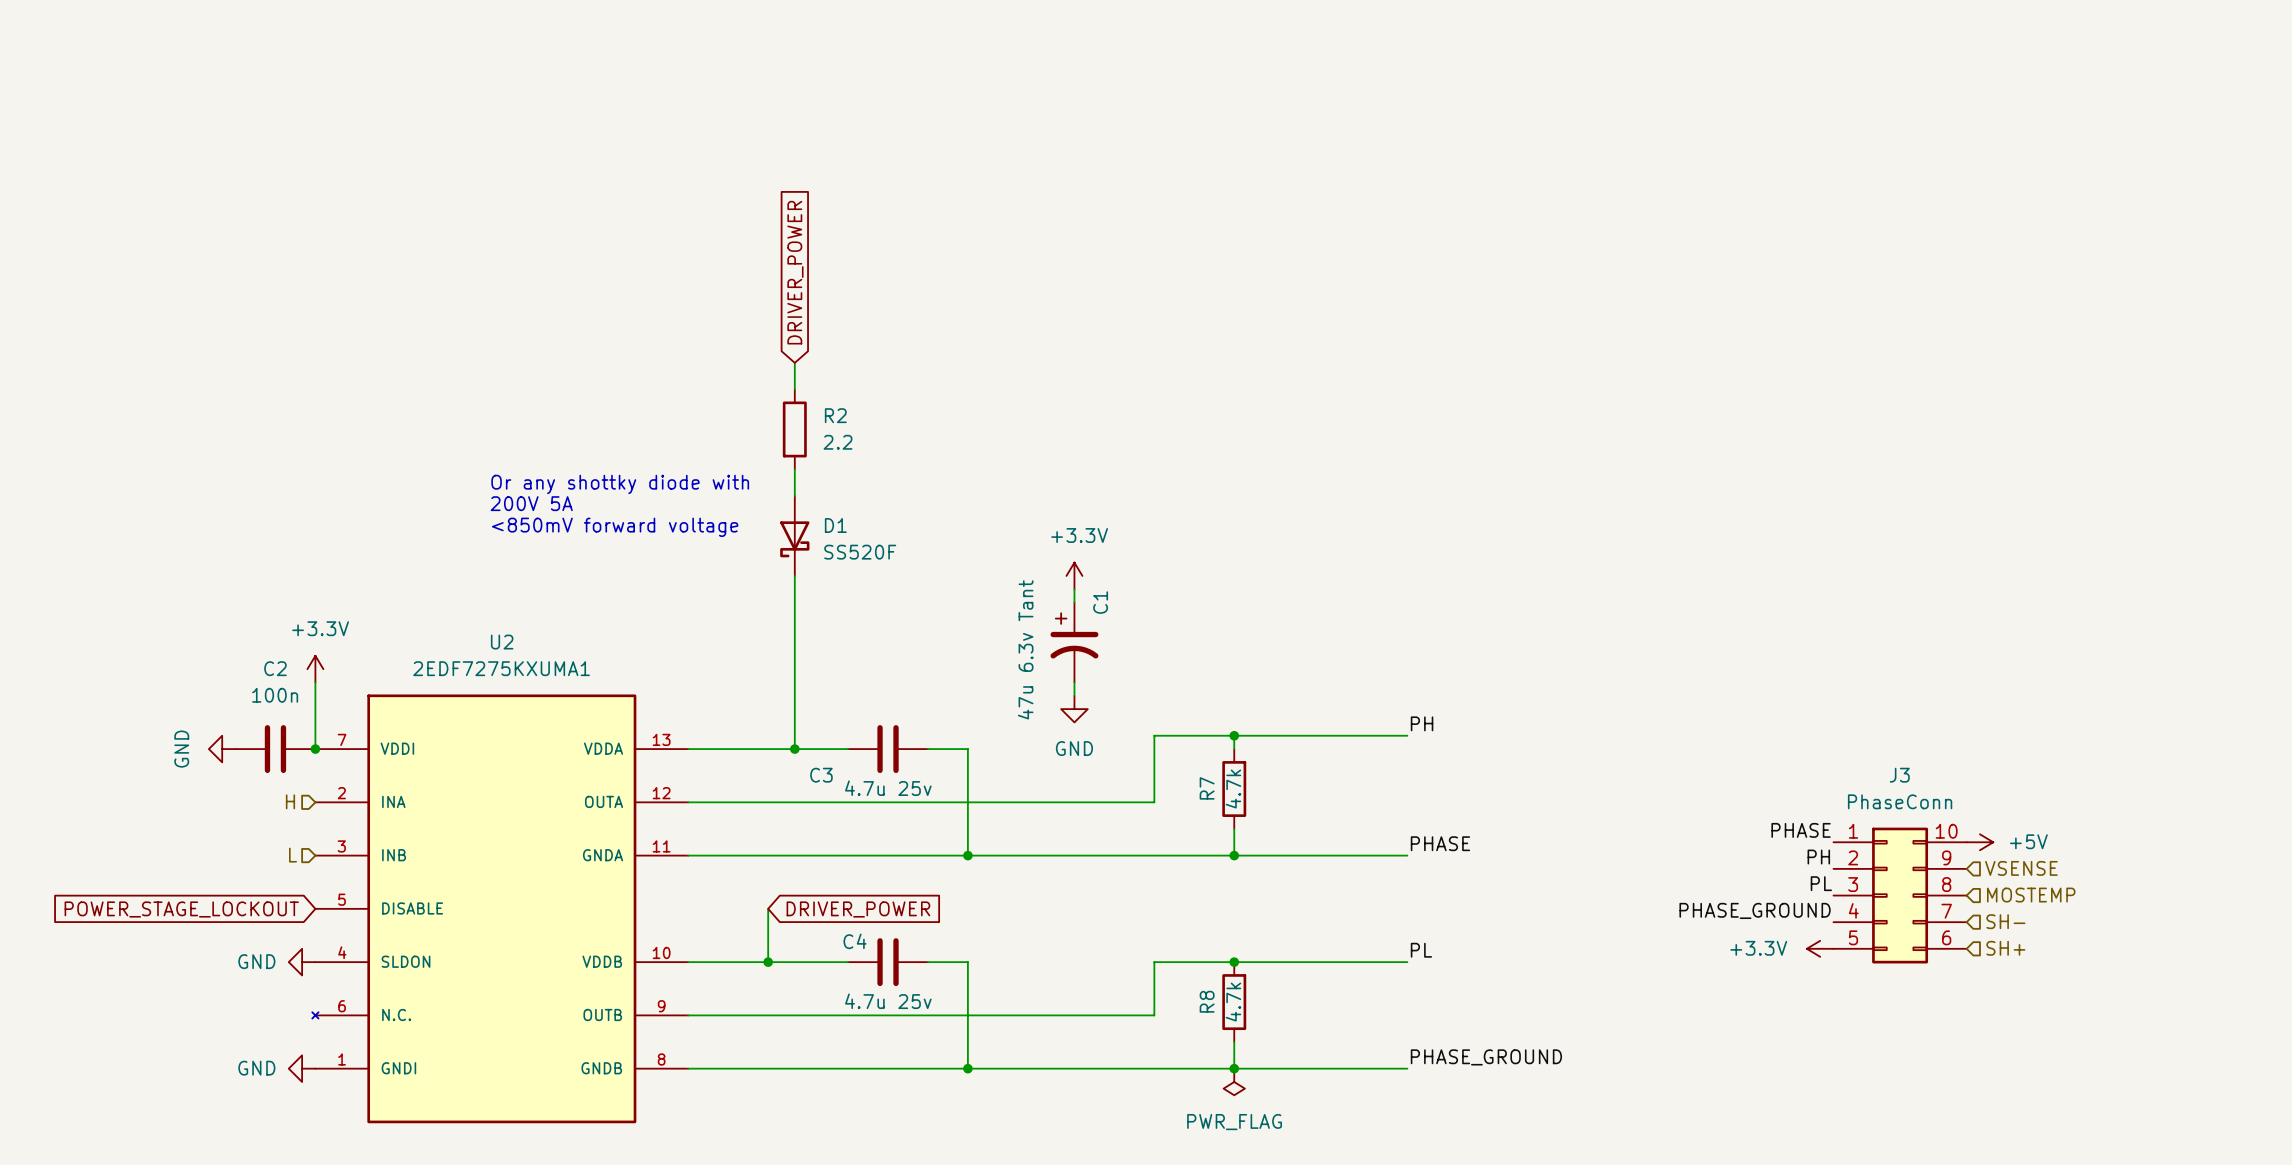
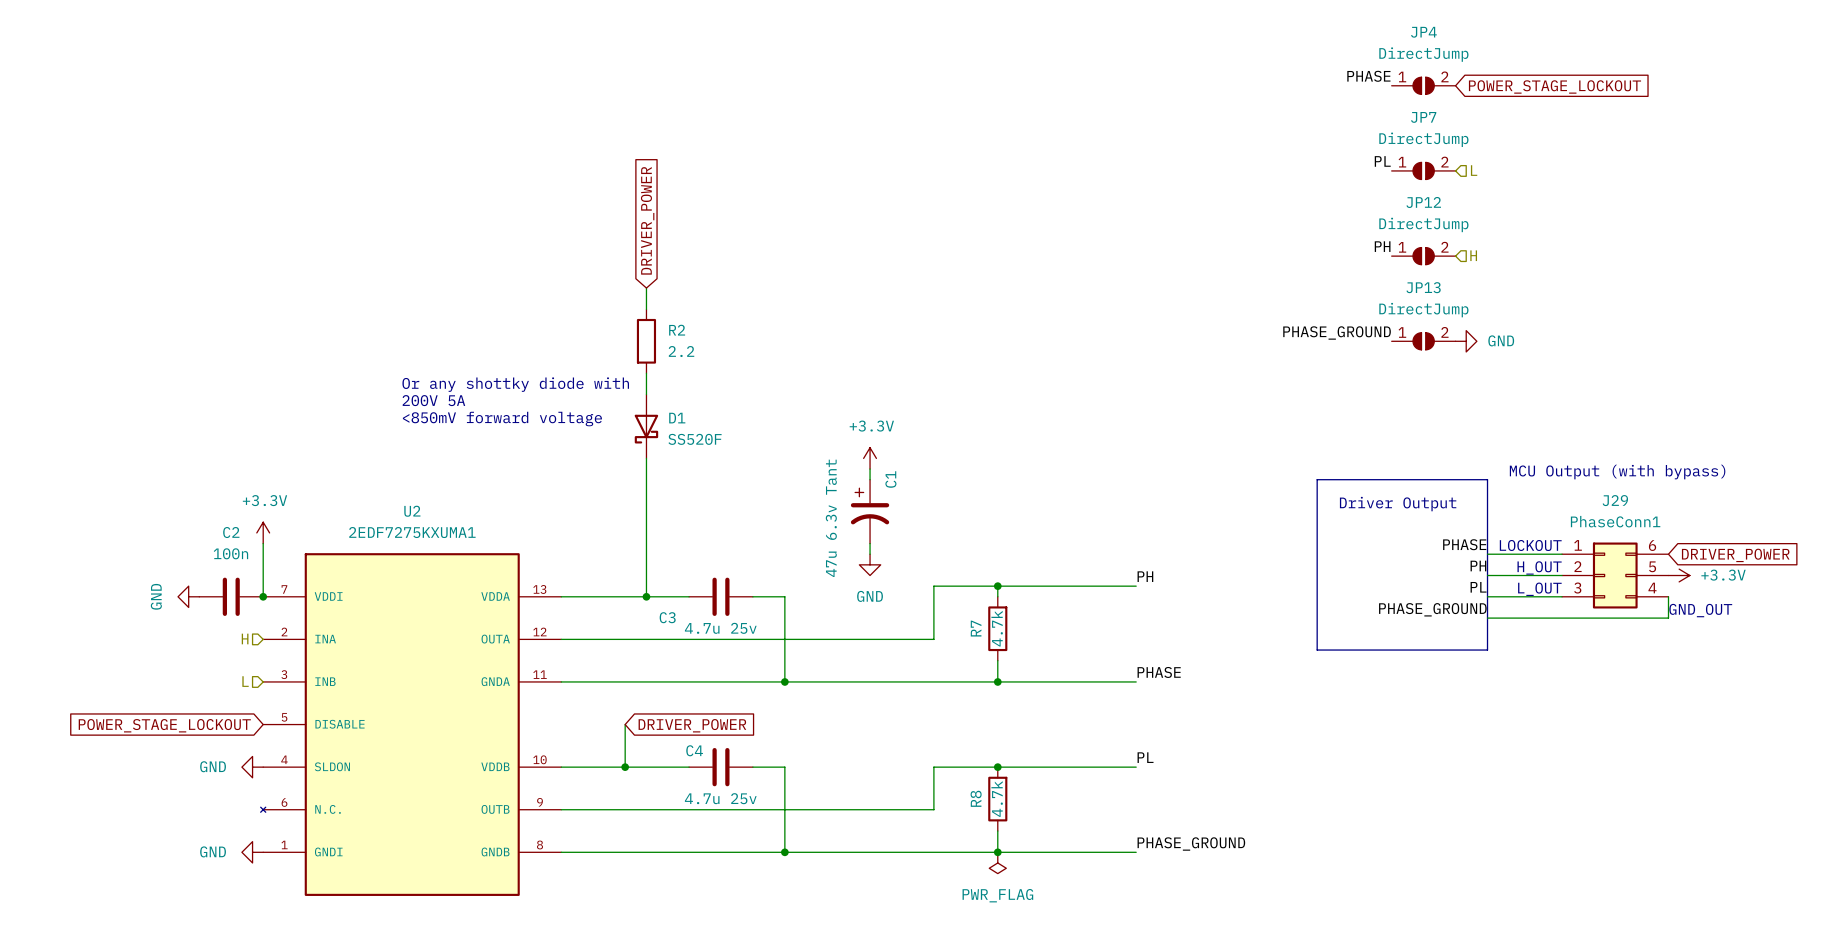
label: none -> PHASE (1368, 76)
JP4: none -> DirectJump (1423, 85)
global label: none -> POWER_STAGE_LOCKOUT (1554, 86)
label: none -> PL (1382, 161)
hierarchical label: none -> L (1474, 170)
JP7: none -> DirectJump (1423, 170)
label: none -> PH (1382, 246)
JP12: none -> DirectJump (1423, 256)
hierarchical label: none -> H (1473, 255)
label: none -> PHASE_GROUND (1337, 332)
JP13: none -> DirectJump (1423, 341)
power symbol: none -> GND (1466, 341)
text: none -> MCU Output (with bypass) (1617, 472)
line: none -> (1317, 479) (1487, 479) (1487, 650) (1317, 650) (1317, 479)
text: none -> Driver Output (1398, 504)
text: none -> LOCKOUT (1530, 545)
wire: none -> (1487, 554) (1562, 554)
global label: none -> DRIVER_POWER (1735, 555)
text: none -> H_OUT (1539, 567)
wire: none -> (1487, 575) (1562, 575)
J29: none -> PhaseConn1 (1615, 575)
power symbol: none -> +3.3V (1679, 575)
text: none -> L_OUT (1539, 589)
wire: none -> (1487, 596) (1562, 596)
wire: none -> (1668, 596) (1668, 618) (1487, 618)
text: none -> GND_OUT (1700, 610)
label position: PHASE (1801, 830) -> PHASE (1464, 544)
power symbol: +5V (1979, 842) -> none
label position: PH (1818, 857) -> PH (1478, 566)
hierarchical label: VSENSE (2021, 868) -> none
label position: PL (1821, 883) -> PL (1478, 587)
J3: PhaseConn (1900, 895) -> none
hierarchical label: MOSTEMP (2031, 895) -> none
label position: PHASE_GROUND (1755, 910) -> PHASE_GROUND (1432, 609)
hierarchical label: SH- (2005, 921) -> none
power symbol: +3.3V (1820, 948) -> none
hierarchical label: SH+ (2005, 948) -> none

